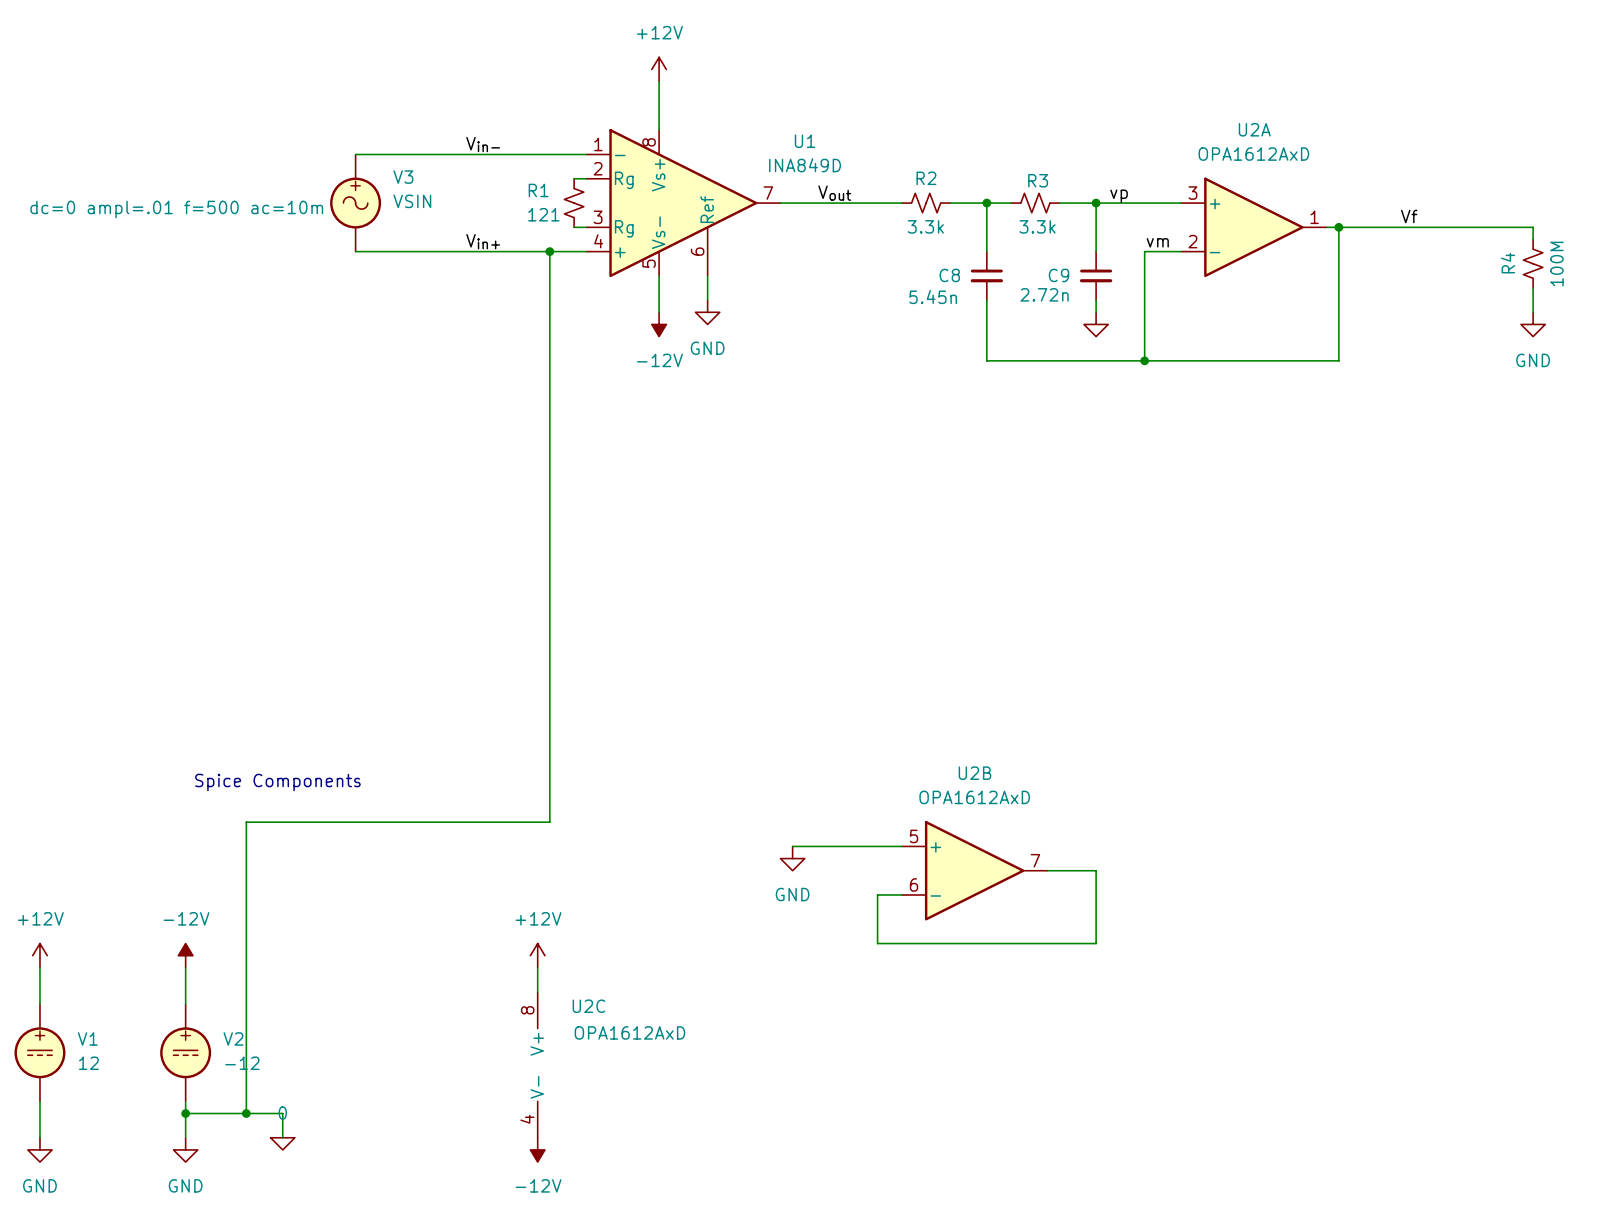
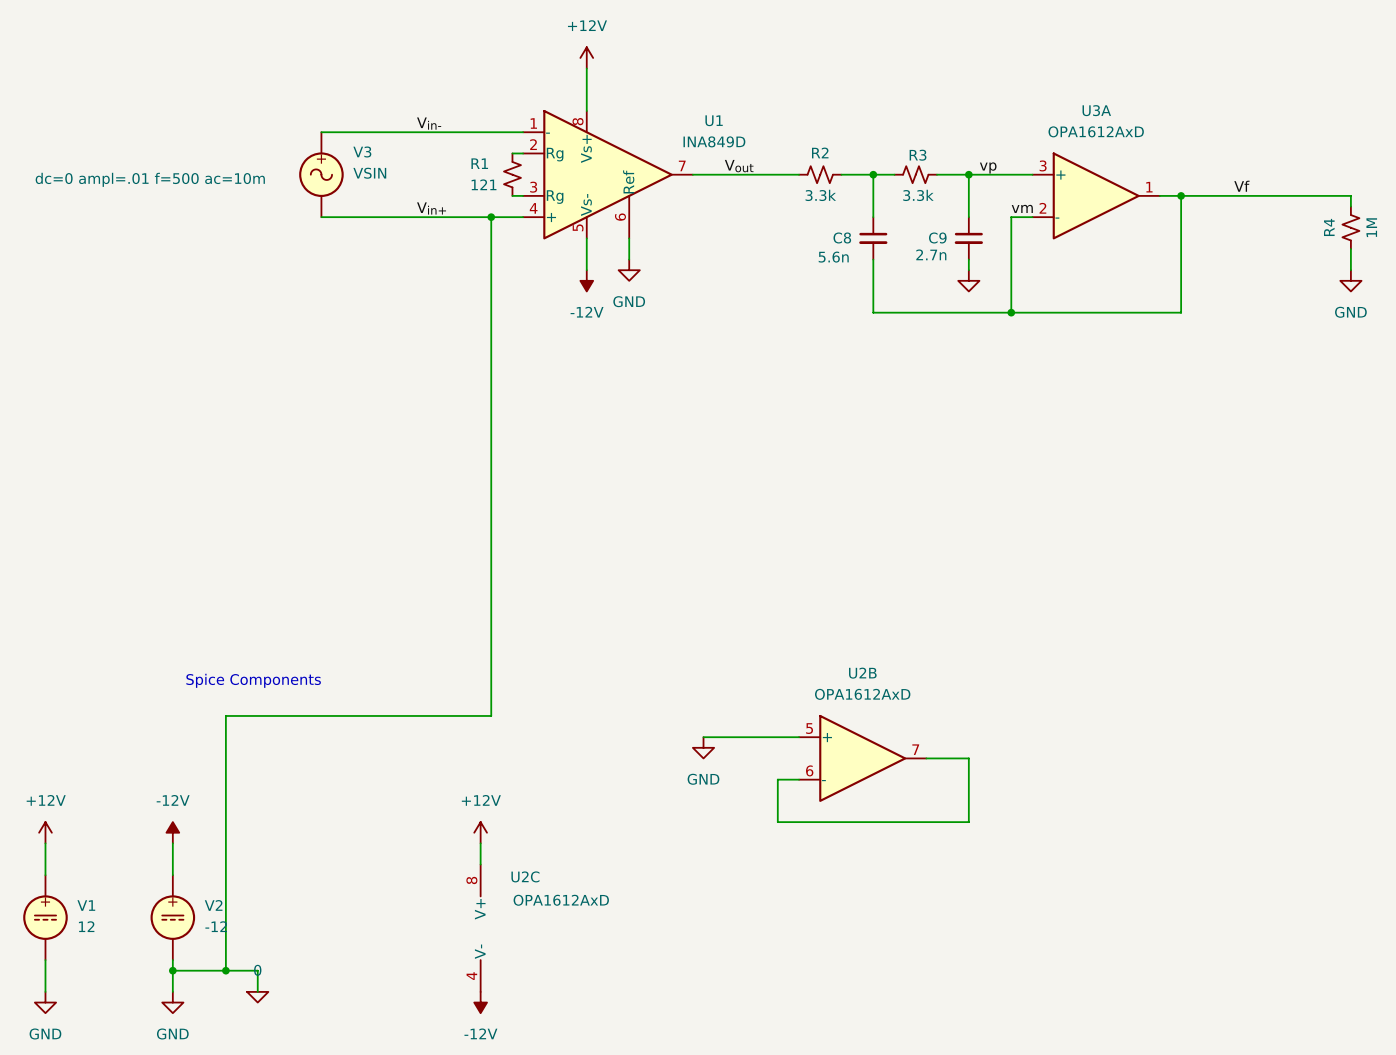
U3A: none -> OPA1612AxD (1096, 195)
U2A: OPA1612AxD (1253, 227) -> none
R4 value: 100M (1556, 264) -> 1M (1371, 227)
C9 value: 2.72n (1044, 294) -> 2.7n (931, 254)
C8 value: 5.45n (933, 297) -> 5.6n (833, 257)

